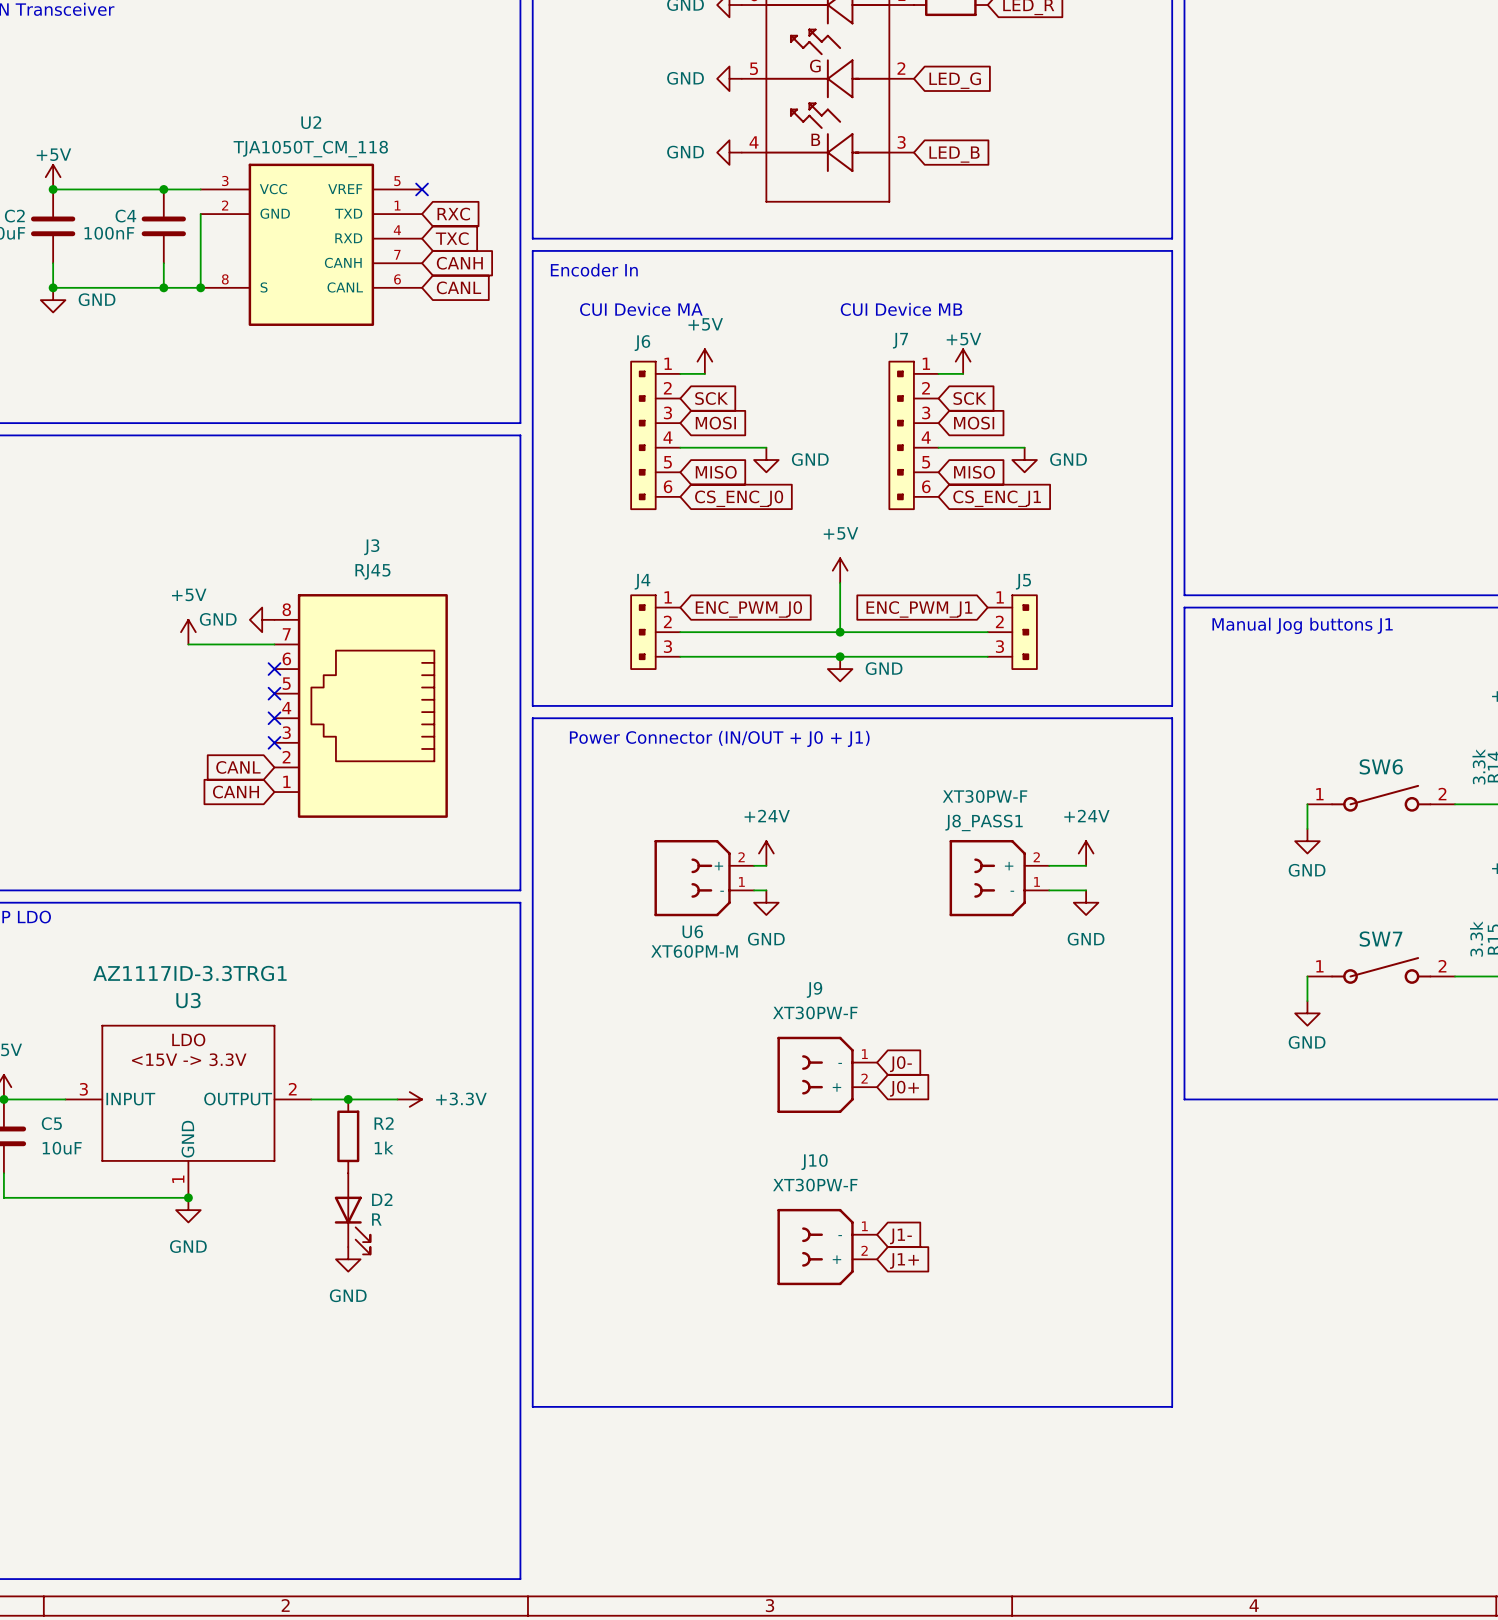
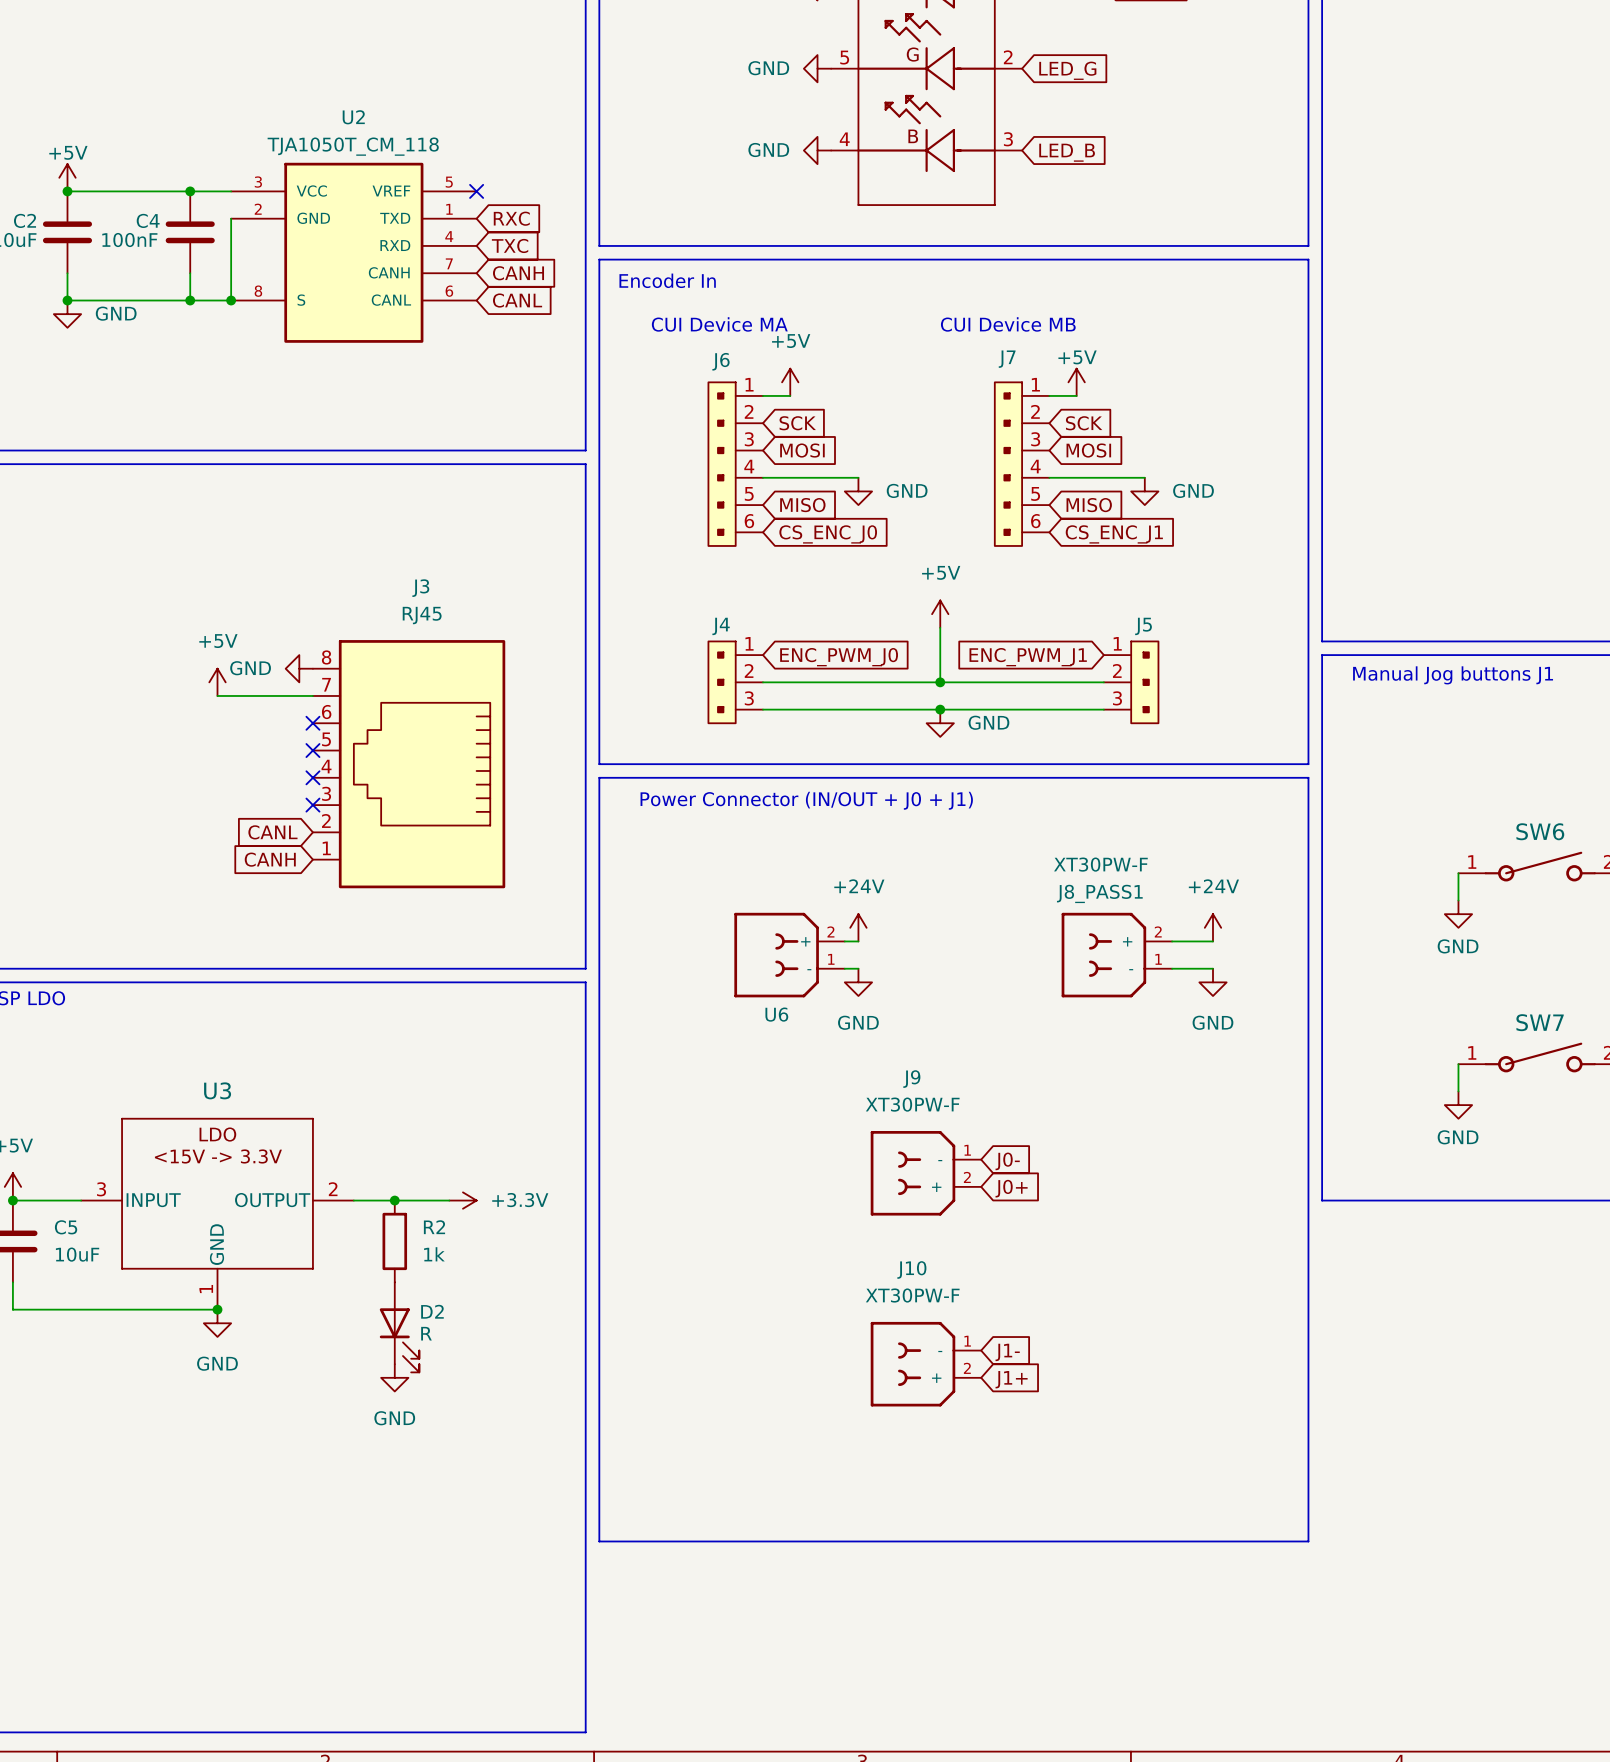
U6 value: XT60PM-M (694, 951) -> none
U3 value: AZ1117ID-3.3TRG1 (190, 973) -> none

